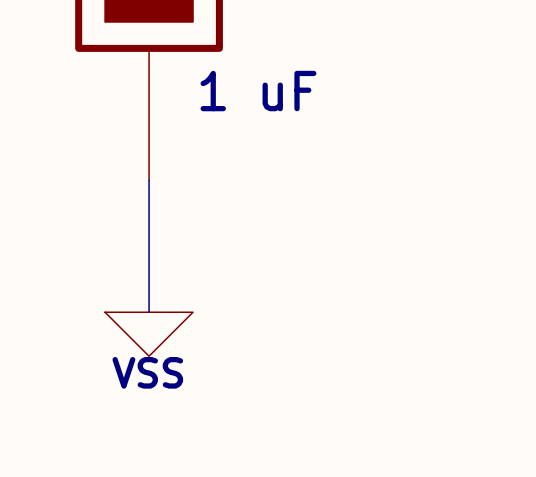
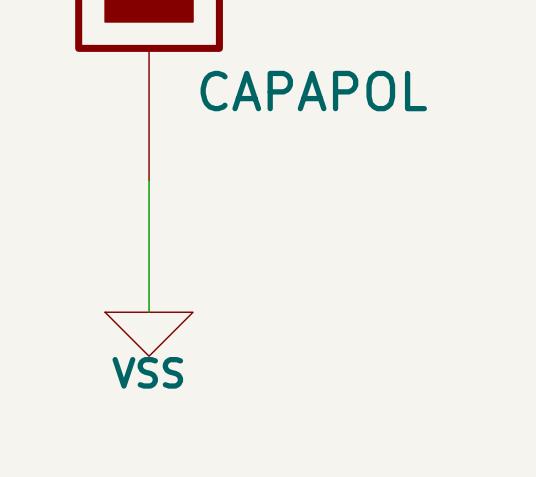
part value: 1 uF (258, 91) -> CAPAPOL (313, 91)

